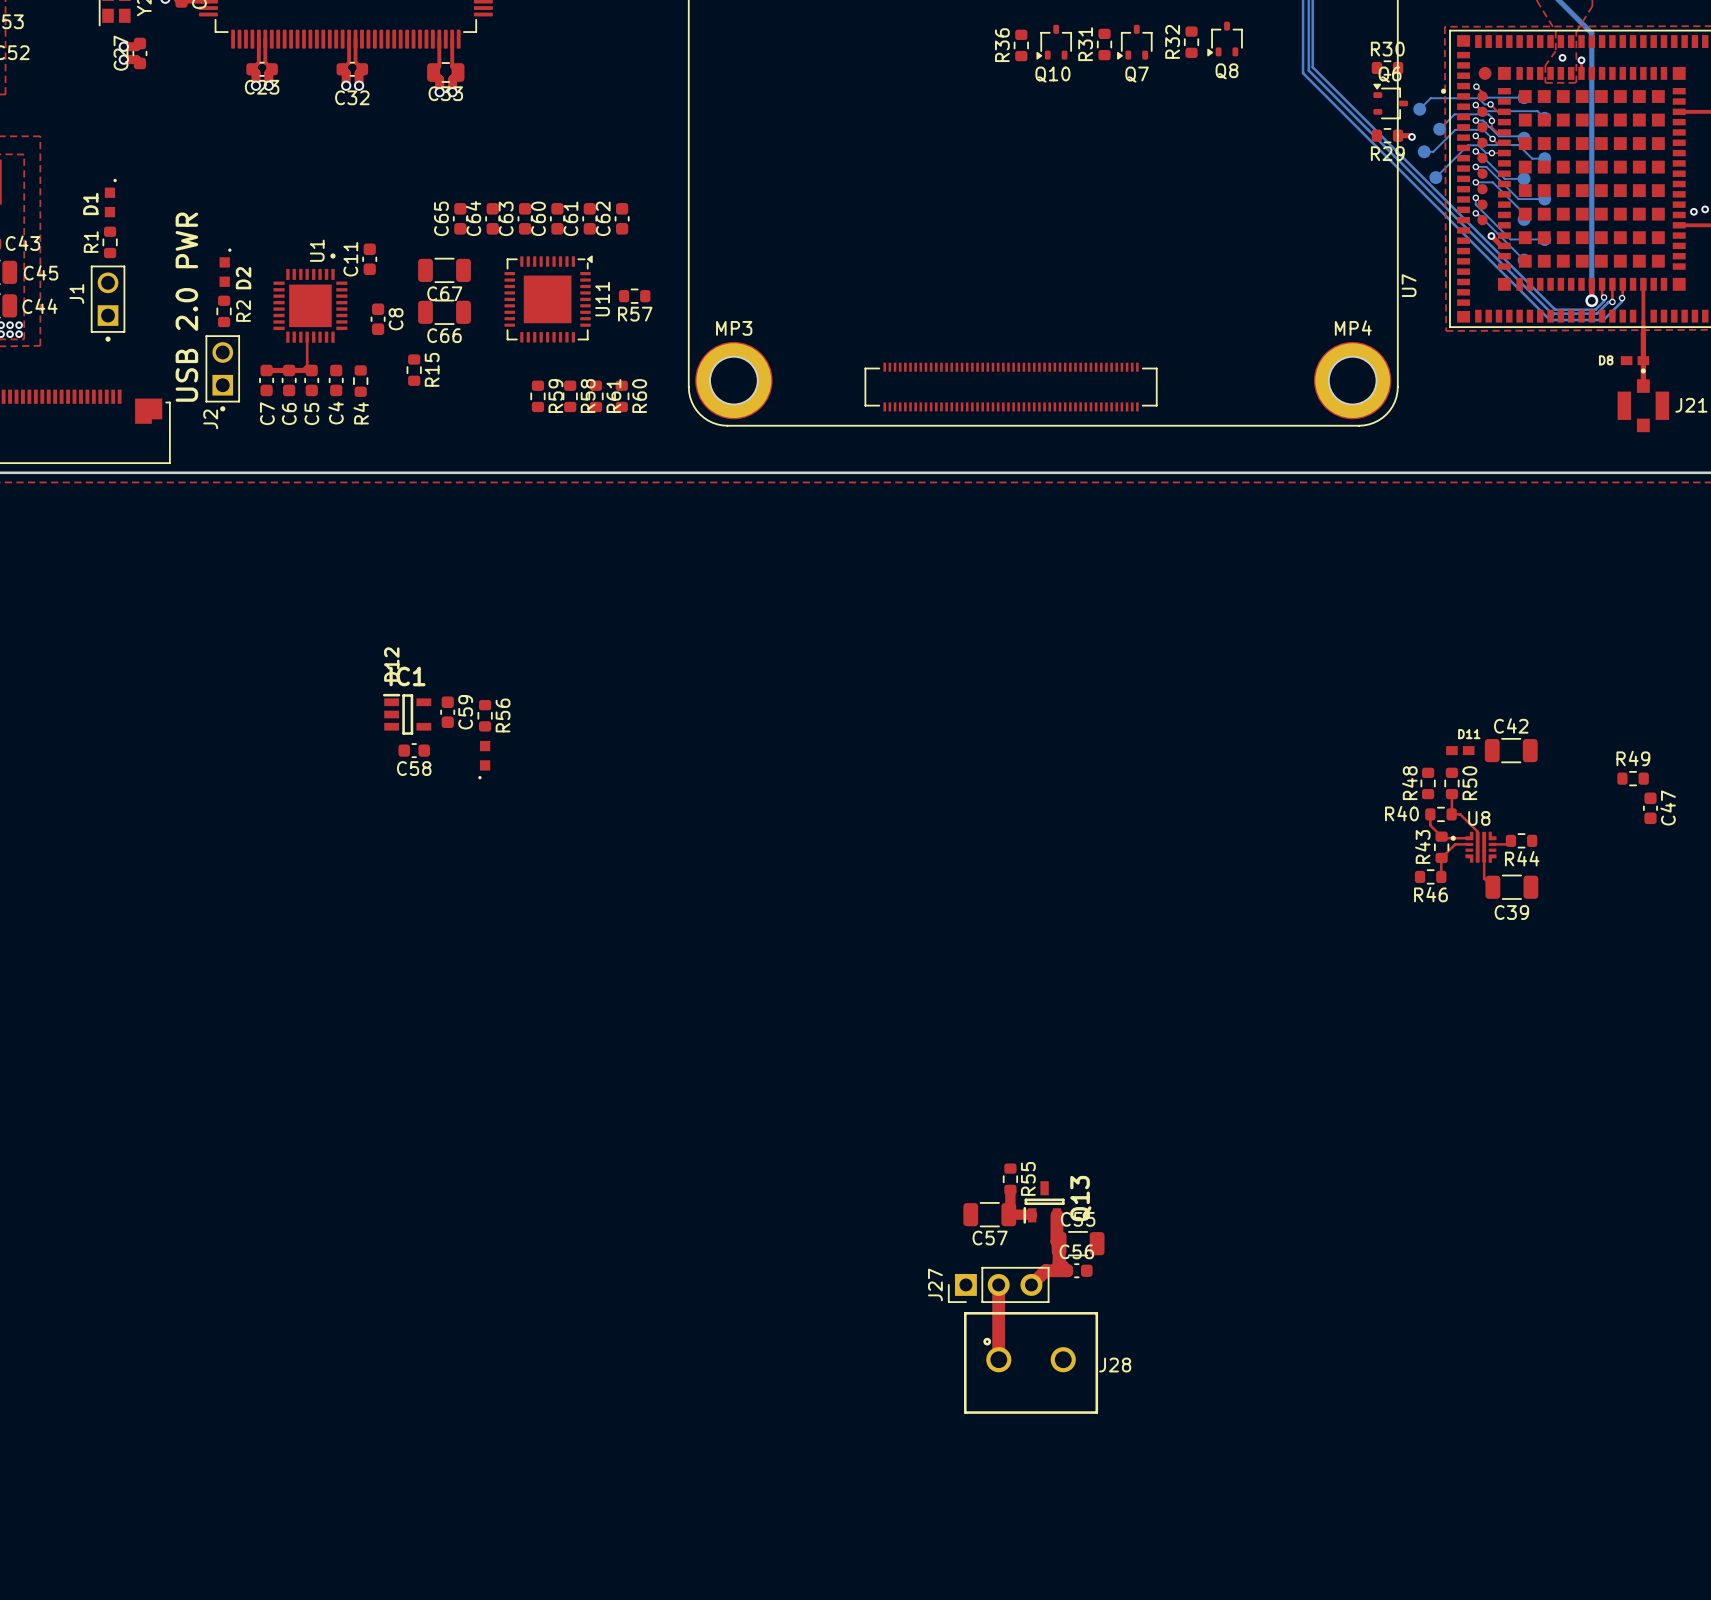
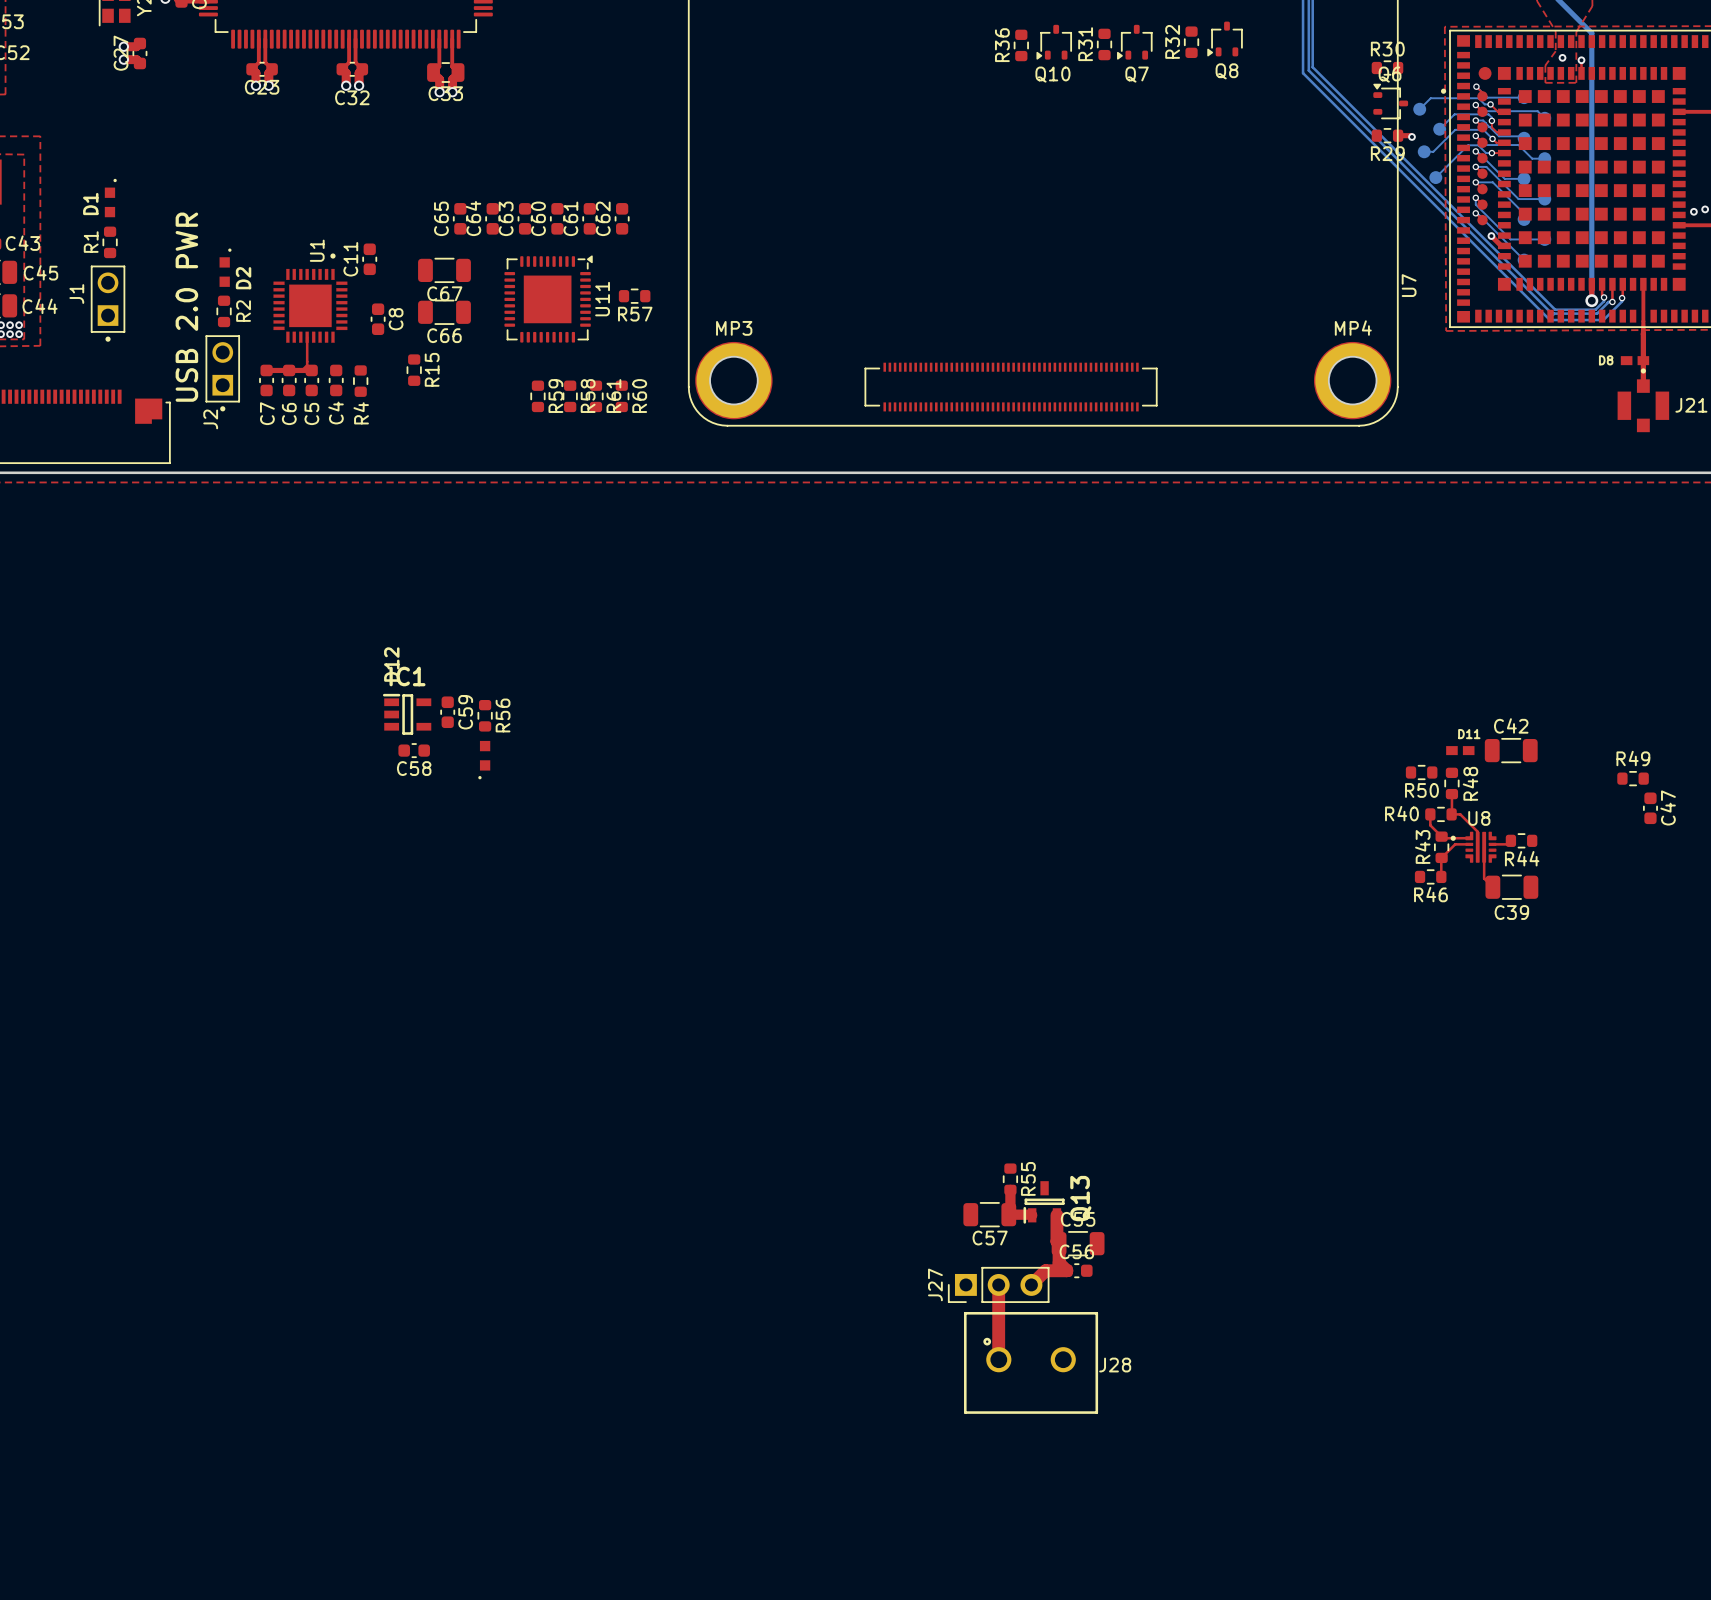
R50: none -> (1421, 772)
R48: (1428, 783) -> none
R50 name: R50 (1469, 783) -> R48 (1470, 783)

